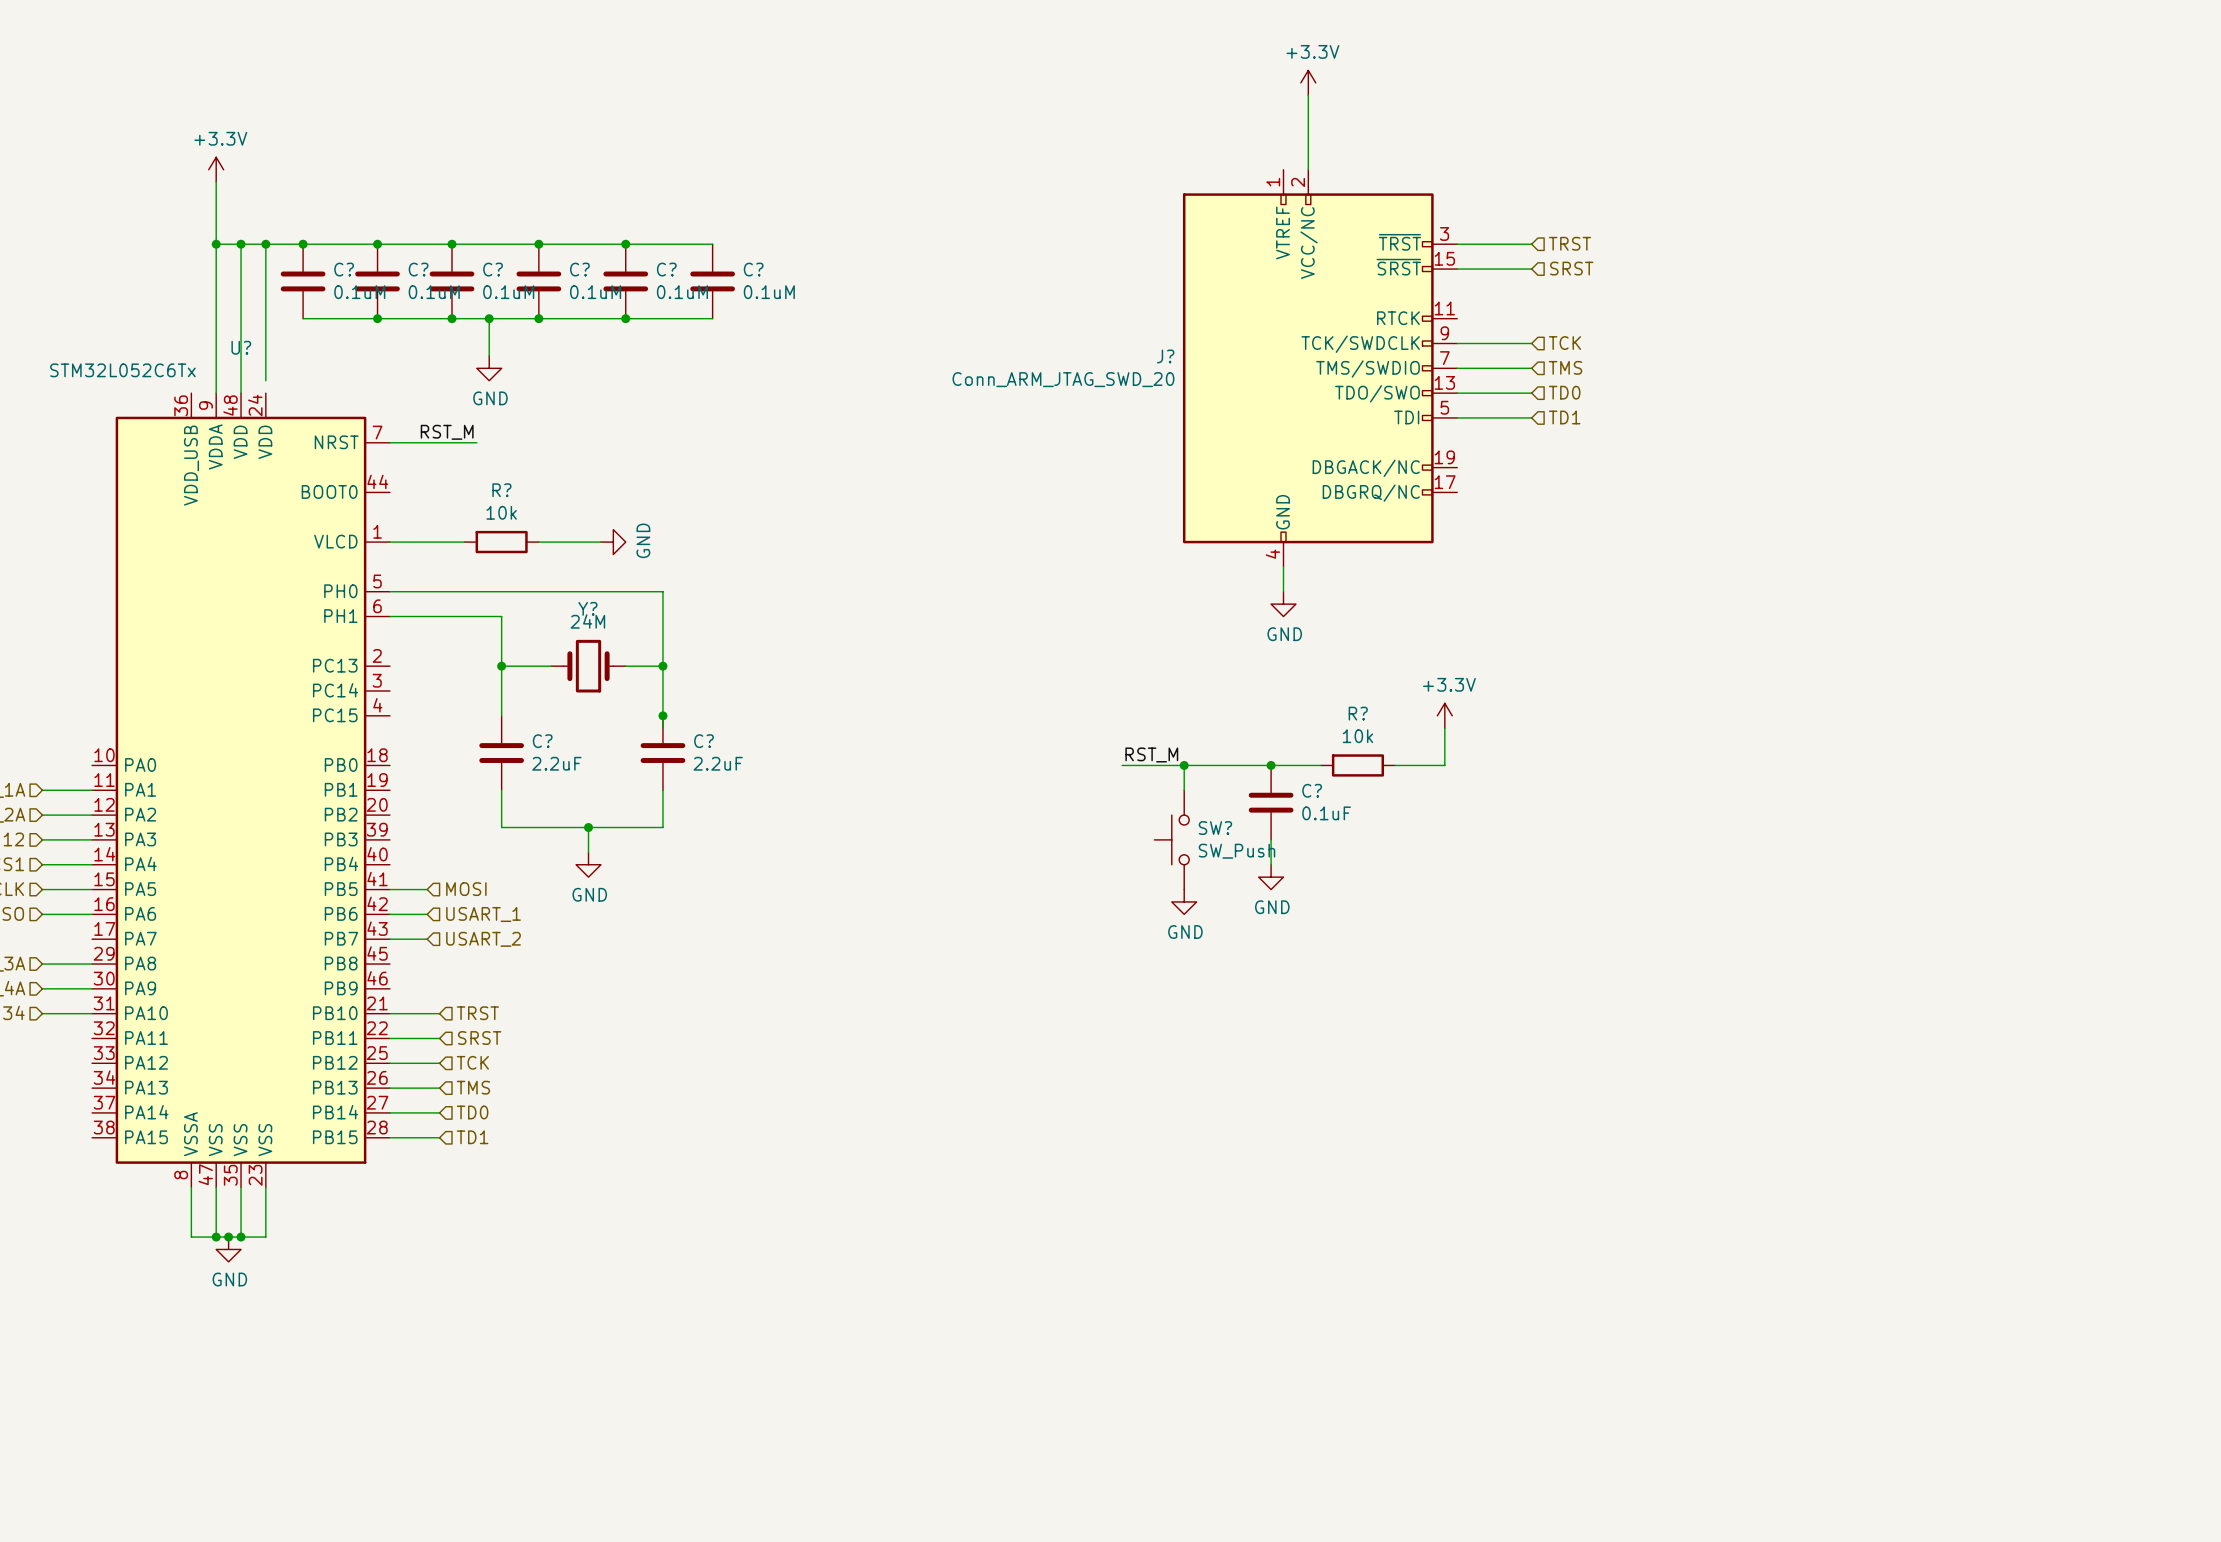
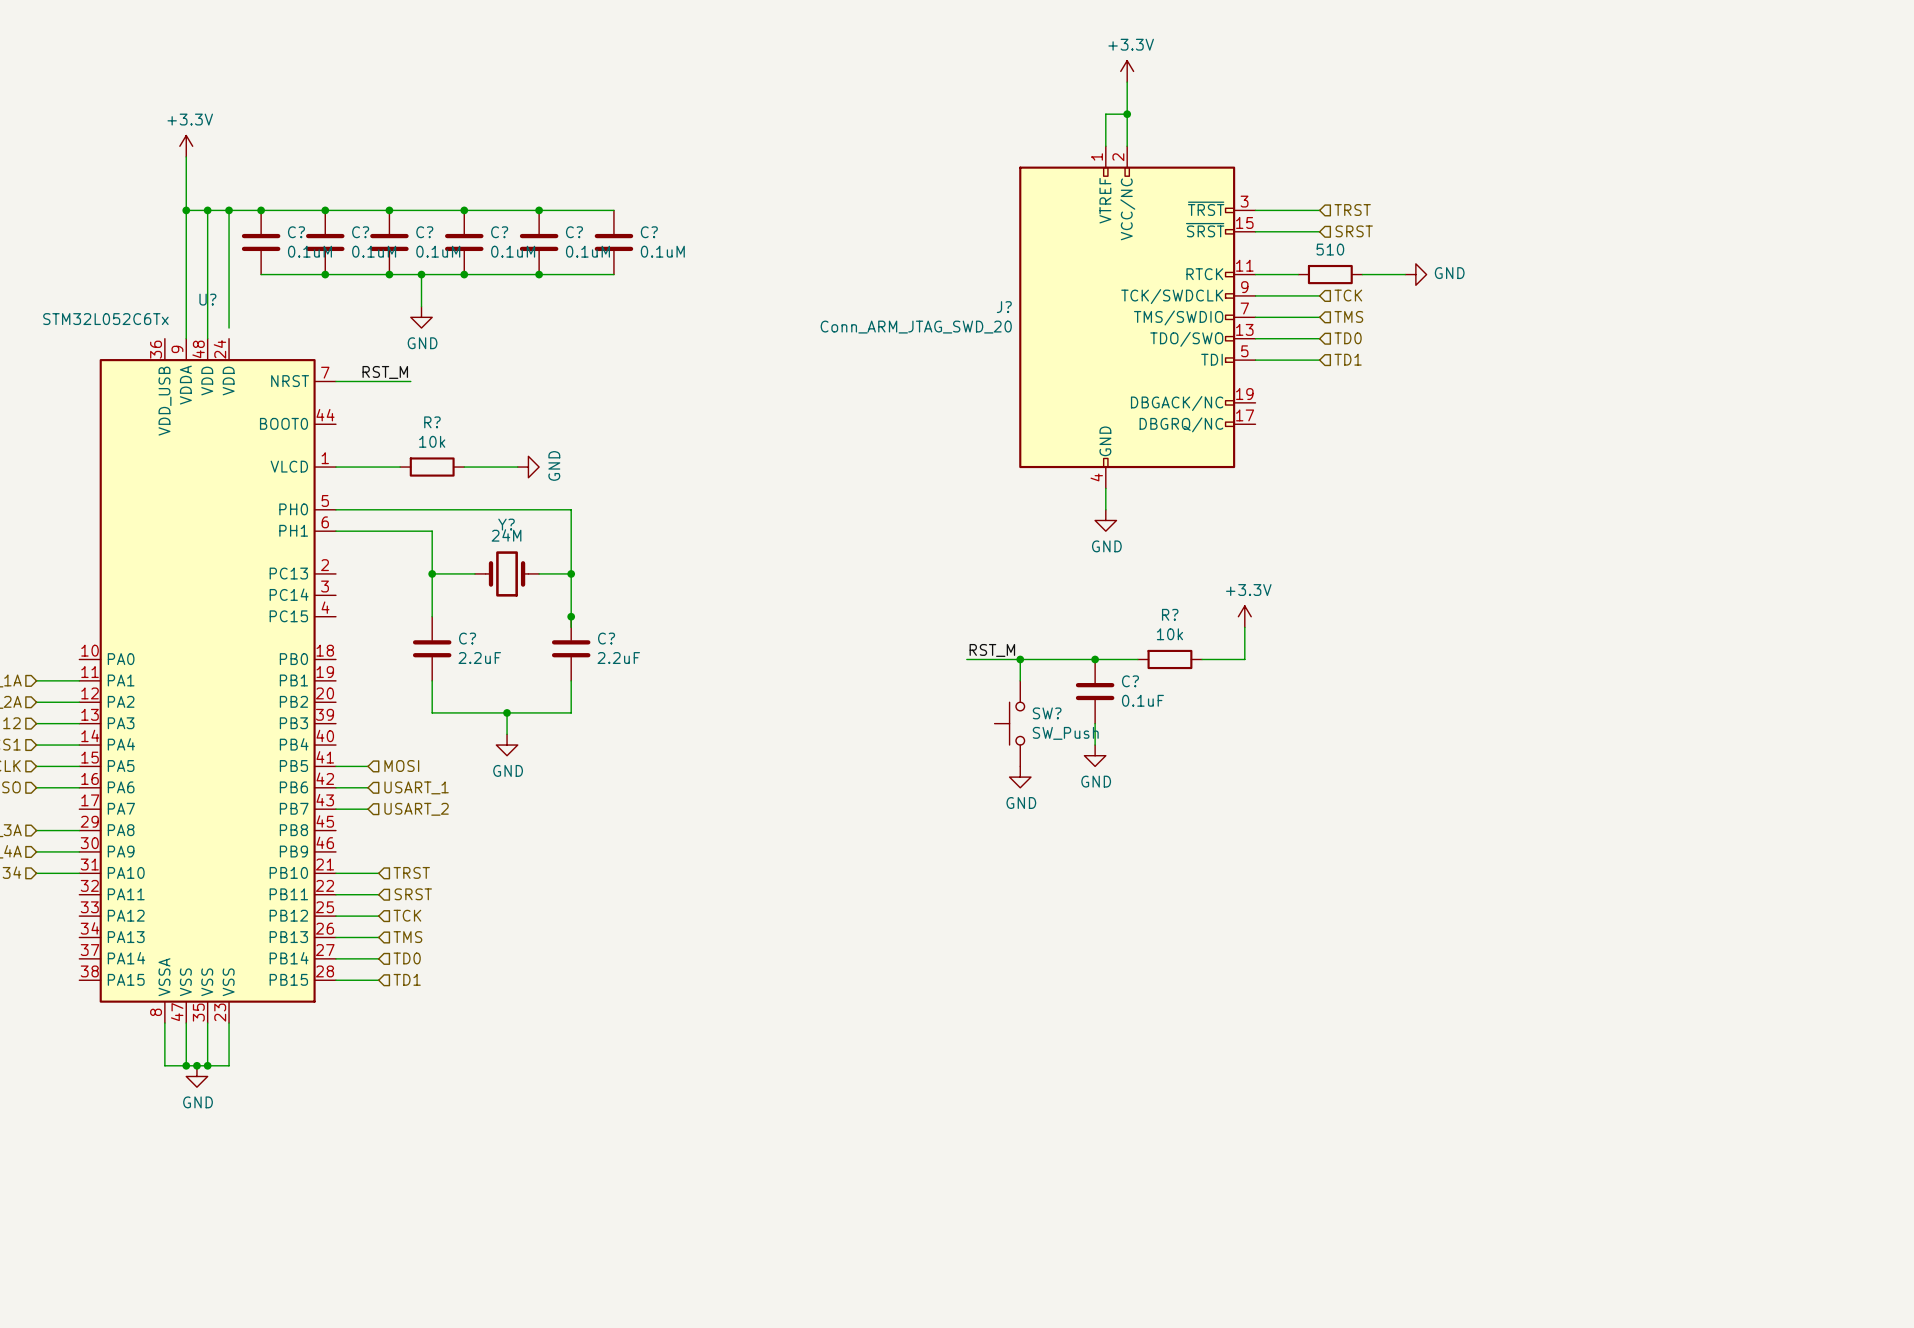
wire: none -> (1127, 114) (1105, 114) (1105, 146)
junction: none -> (1127, 114)
wire: none -> (1255, 274) (1298, 274)
part: none -> 510 (1330, 274)
wire: none -> (1362, 274) (1405, 274)
power symbol: none -> GND (1415, 274)

